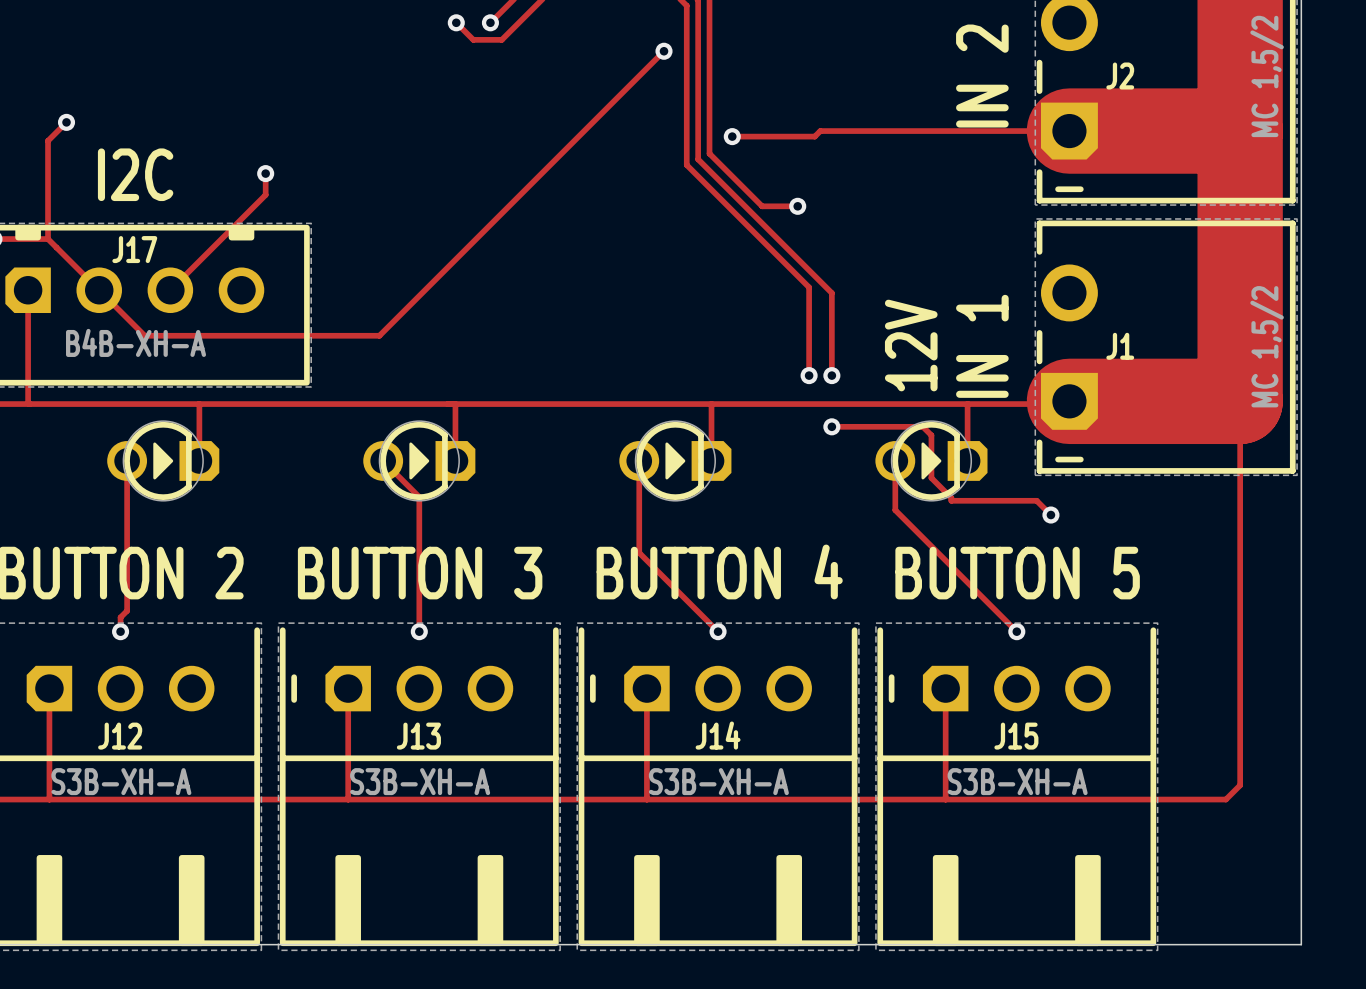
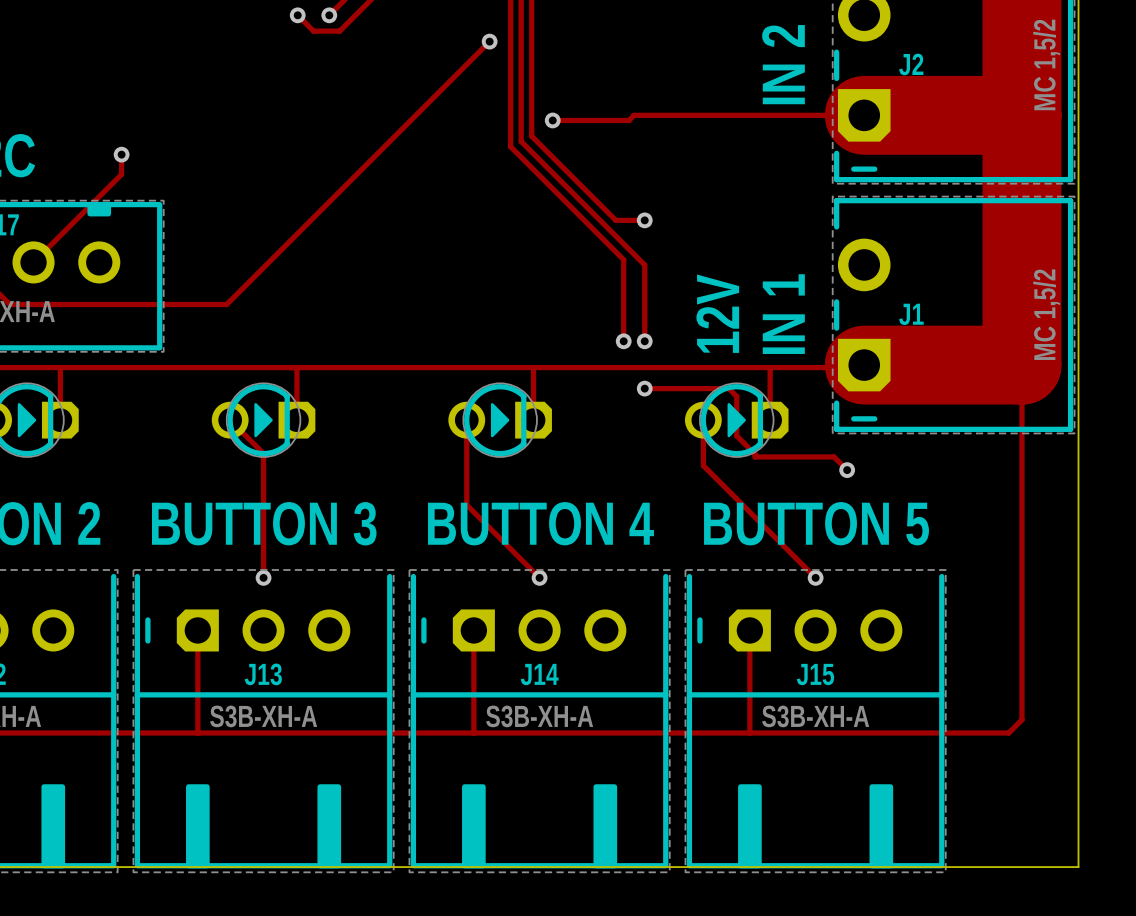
track: (762, 206) (797, 206) -> (580, 184) (615, 220) (644, 220)
via position: (797, 206) -> (644, 220)

